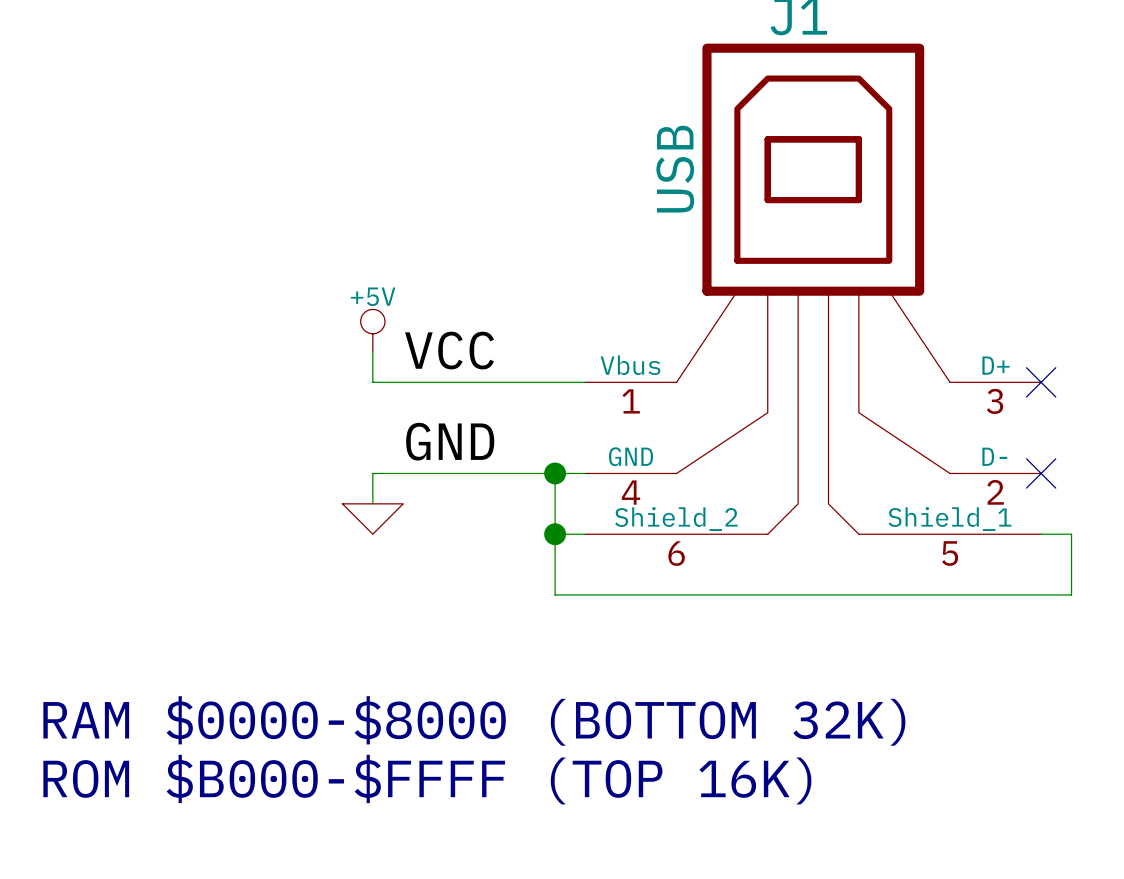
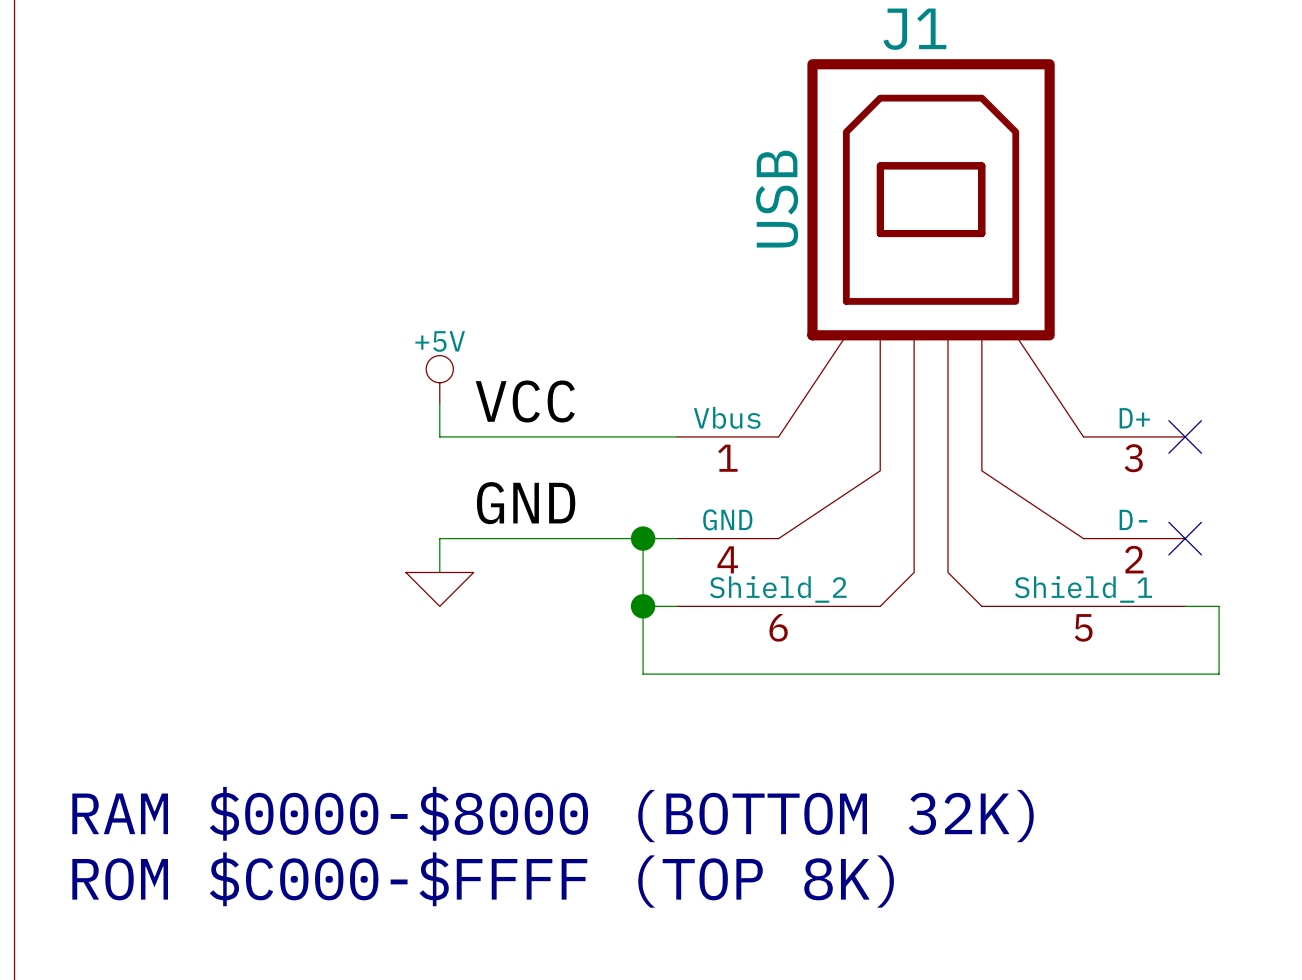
text: ROM $B000-$FFFF (TOP 16K) (427, 779) -> ROM $C000-$FFFF (TOP 8K) (483, 880)

